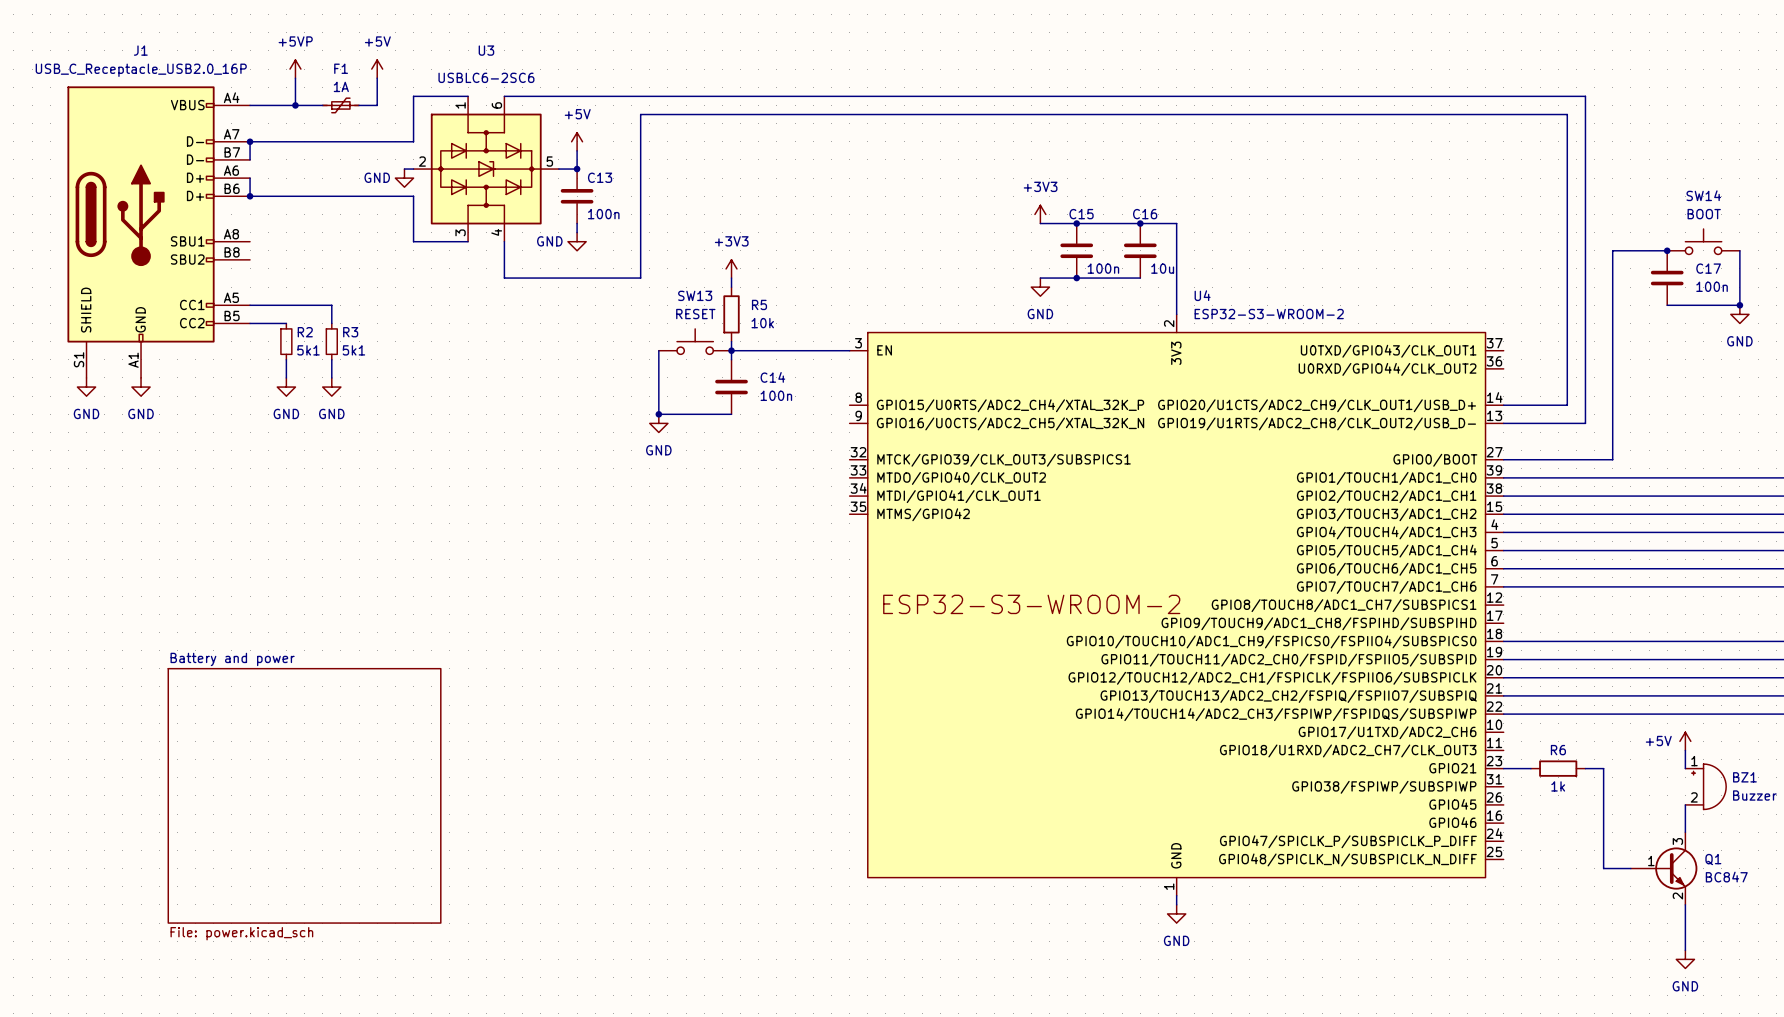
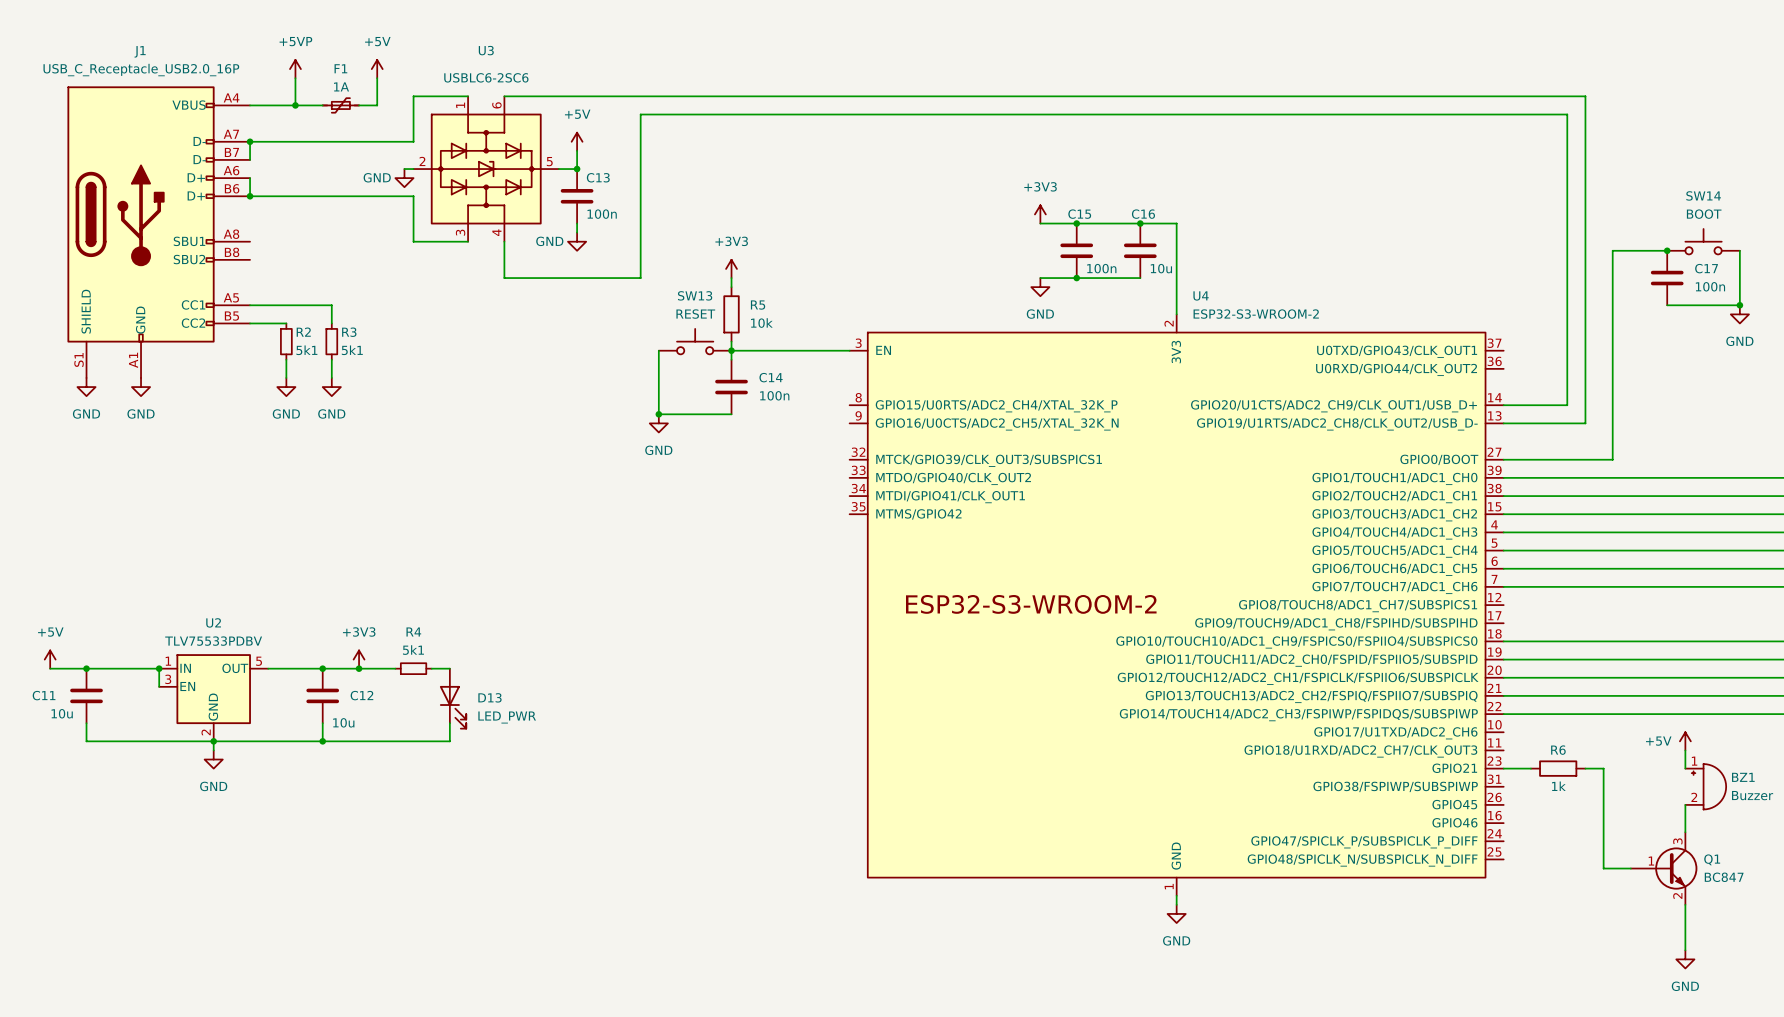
power symbol: none -> +5V (50, 659)
power symbol: none -> +3V3 (359, 659)
wire: none -> (50, 668) (159, 668) (159, 686)
junction: none -> (86, 668)
junction: none -> (159, 668)
junction: none -> (322, 668)
junction: none -> (359, 668)
R4: none -> 5k1 (413, 668)
C11: none -> 10u (86, 695)
C12: none -> 10u (322, 695)
U2: none -> TLV75533PDBV (213, 697)
D13: none -> LED_PWR (453, 698)
wire: none -> (86, 723) (86, 741) (449, 741) (449, 723)
wire: none -> (322, 723) (322, 741)
wire: none -> (213, 741) (213, 750)
junction: none -> (213, 741)
junction: none -> (322, 741)
power symbol: none -> GND (213, 759)
sheet Battery and power: File: power.kicad_sch (304, 795) -> none

